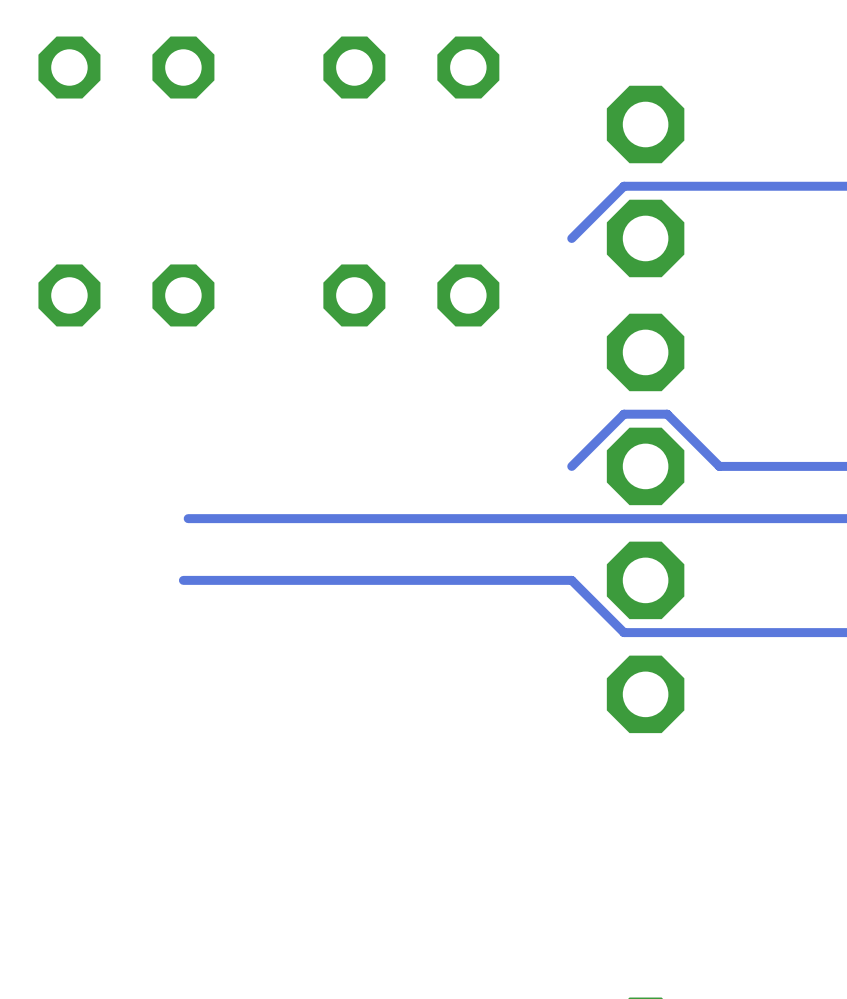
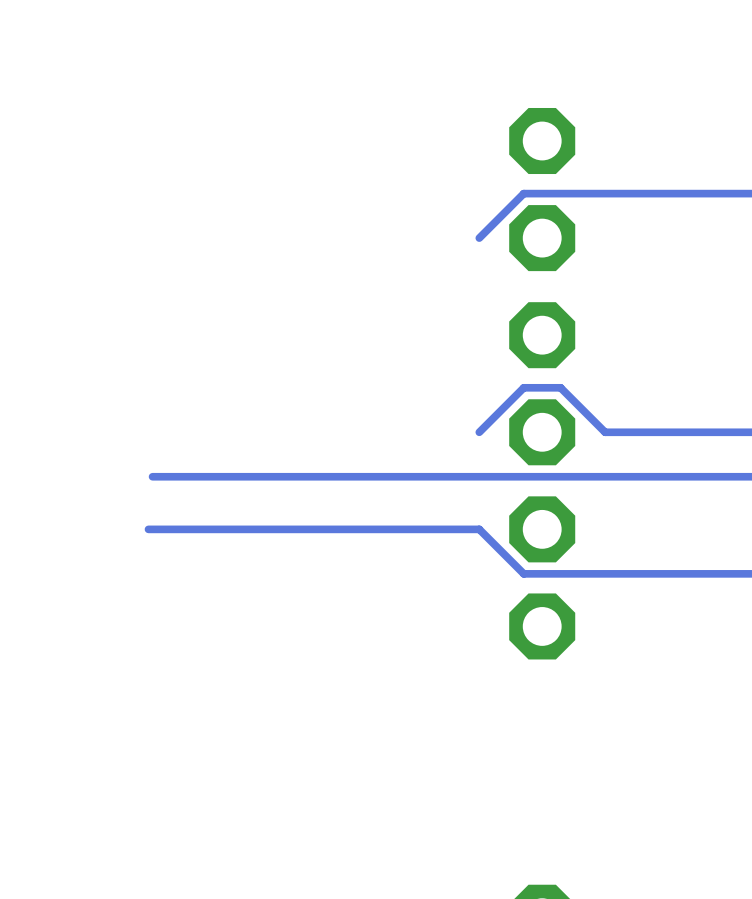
part: (126, 67) -> none
part: (411, 67) -> none
part: (126, 295) -> none
part: (411, 295) -> none

